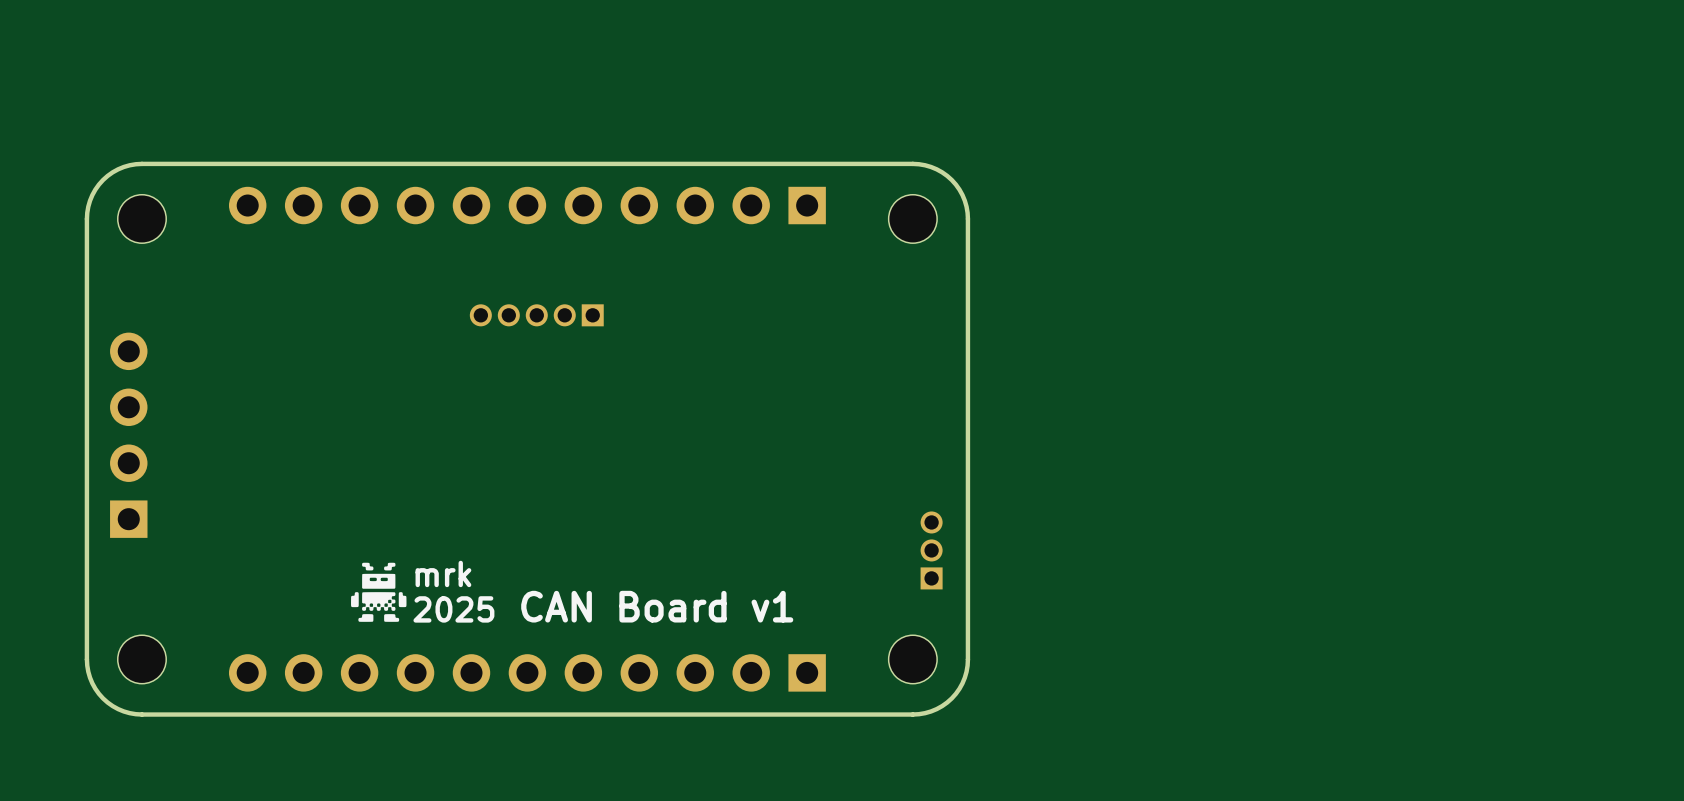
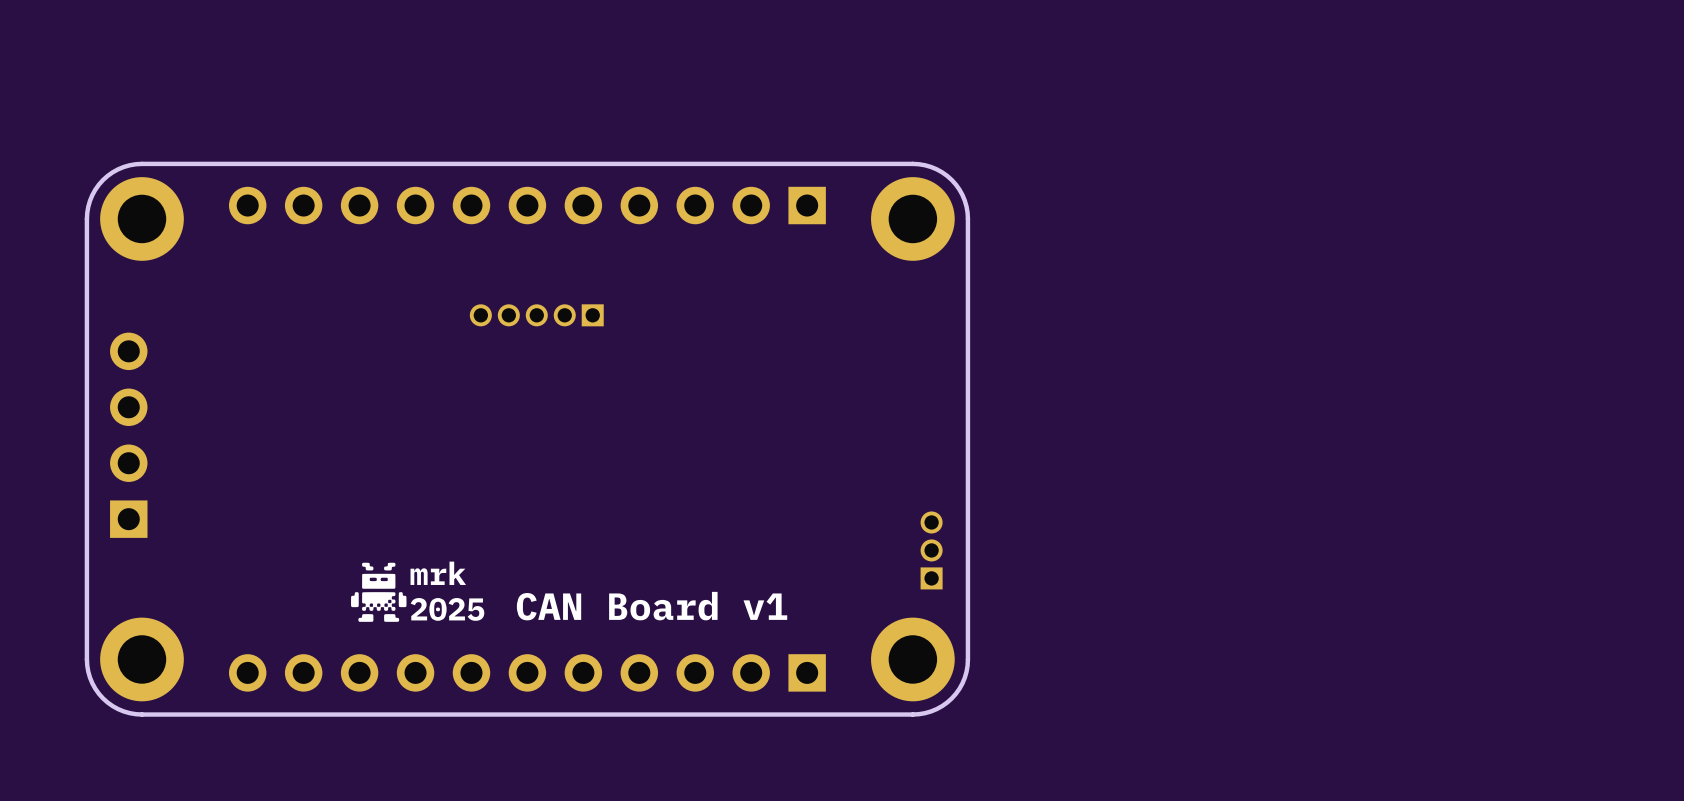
part footprint: [117, 194, 167, 244] -> [100, 177, 184, 261]
part footprint: [888, 194, 938, 244] -> [871, 177, 955, 261]
part footprint: [117, 635, 167, 684] -> [100, 617, 184, 702]
part footprint: [888, 635, 938, 684] -> [871, 617, 955, 702]

